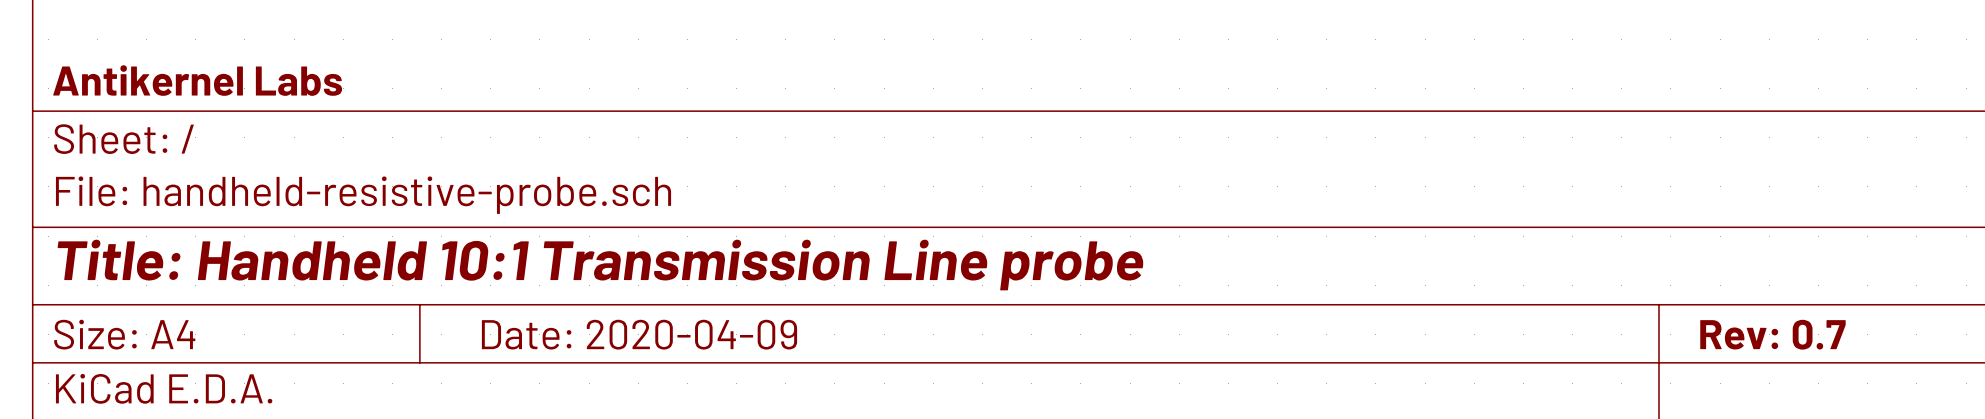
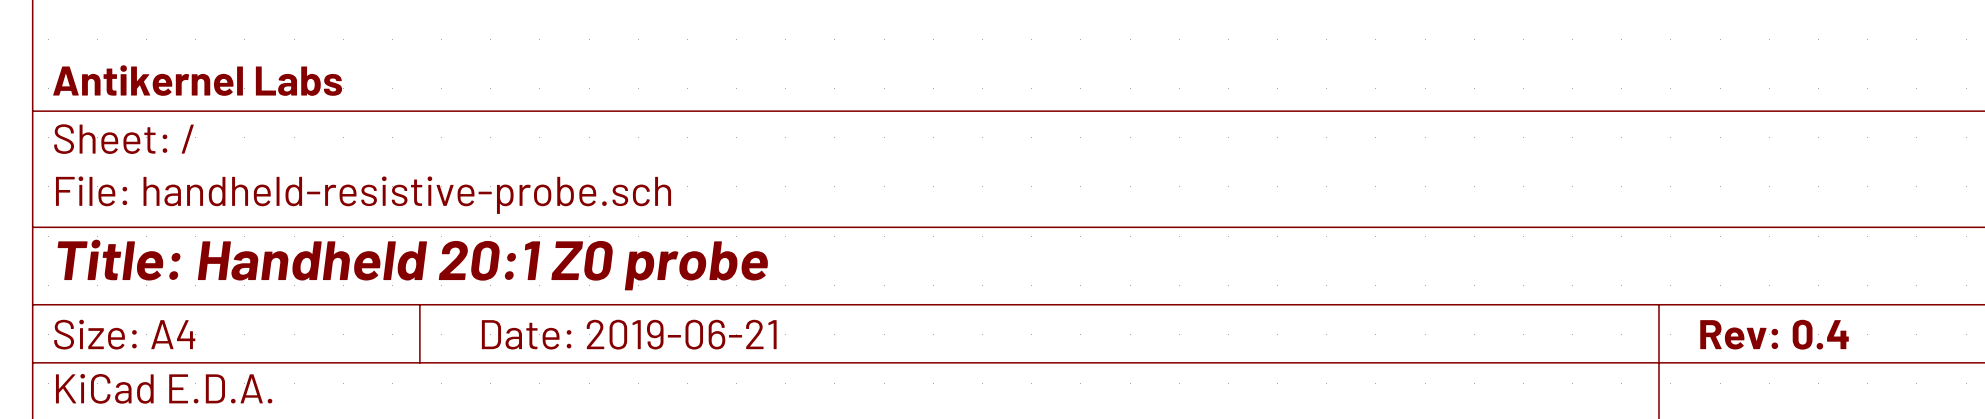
title block: Title: Handheld 10:1 Transmission Line probe (600, 265) -> Title: Handheld 20:1 Z0 probe (412, 265)
title block: Date: 2020-04-09 (639, 334) -> Date: 2019-06-21 (629, 334)
title block: Rev: 0.7 (1772, 334) -> Rev: 0.4 (1774, 334)

